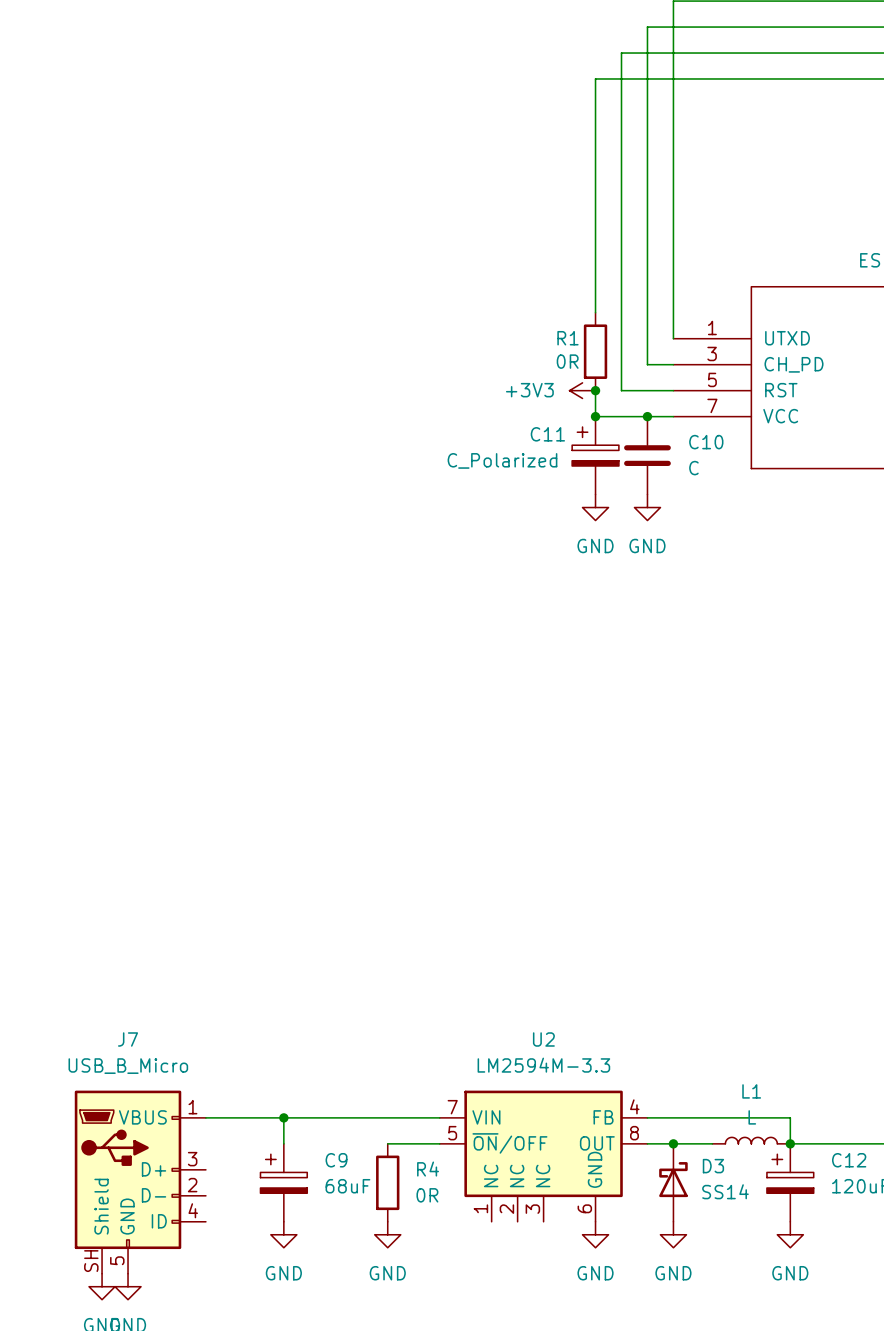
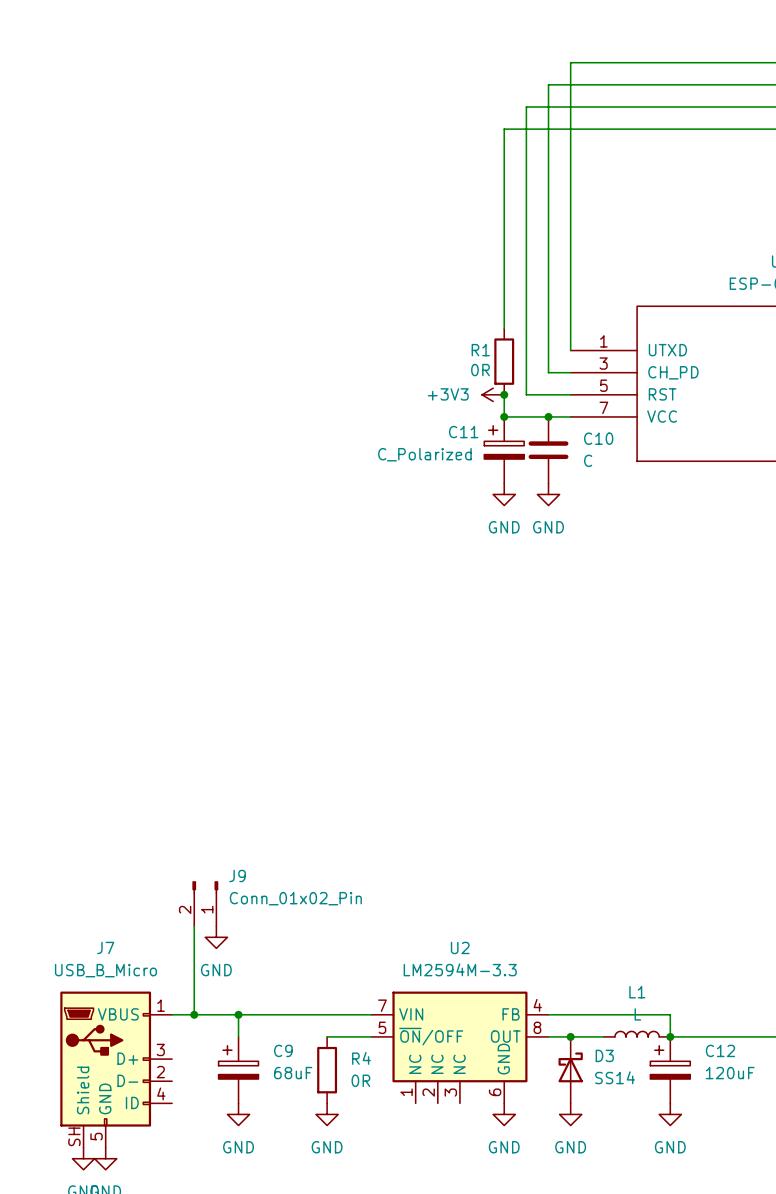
J9: none -> Conn_01x02_Pin (205, 903)
wire: none -> (194, 926) (194, 1014)
power symbol: none -> GND (216, 937)
junction: none -> (194, 1014)

